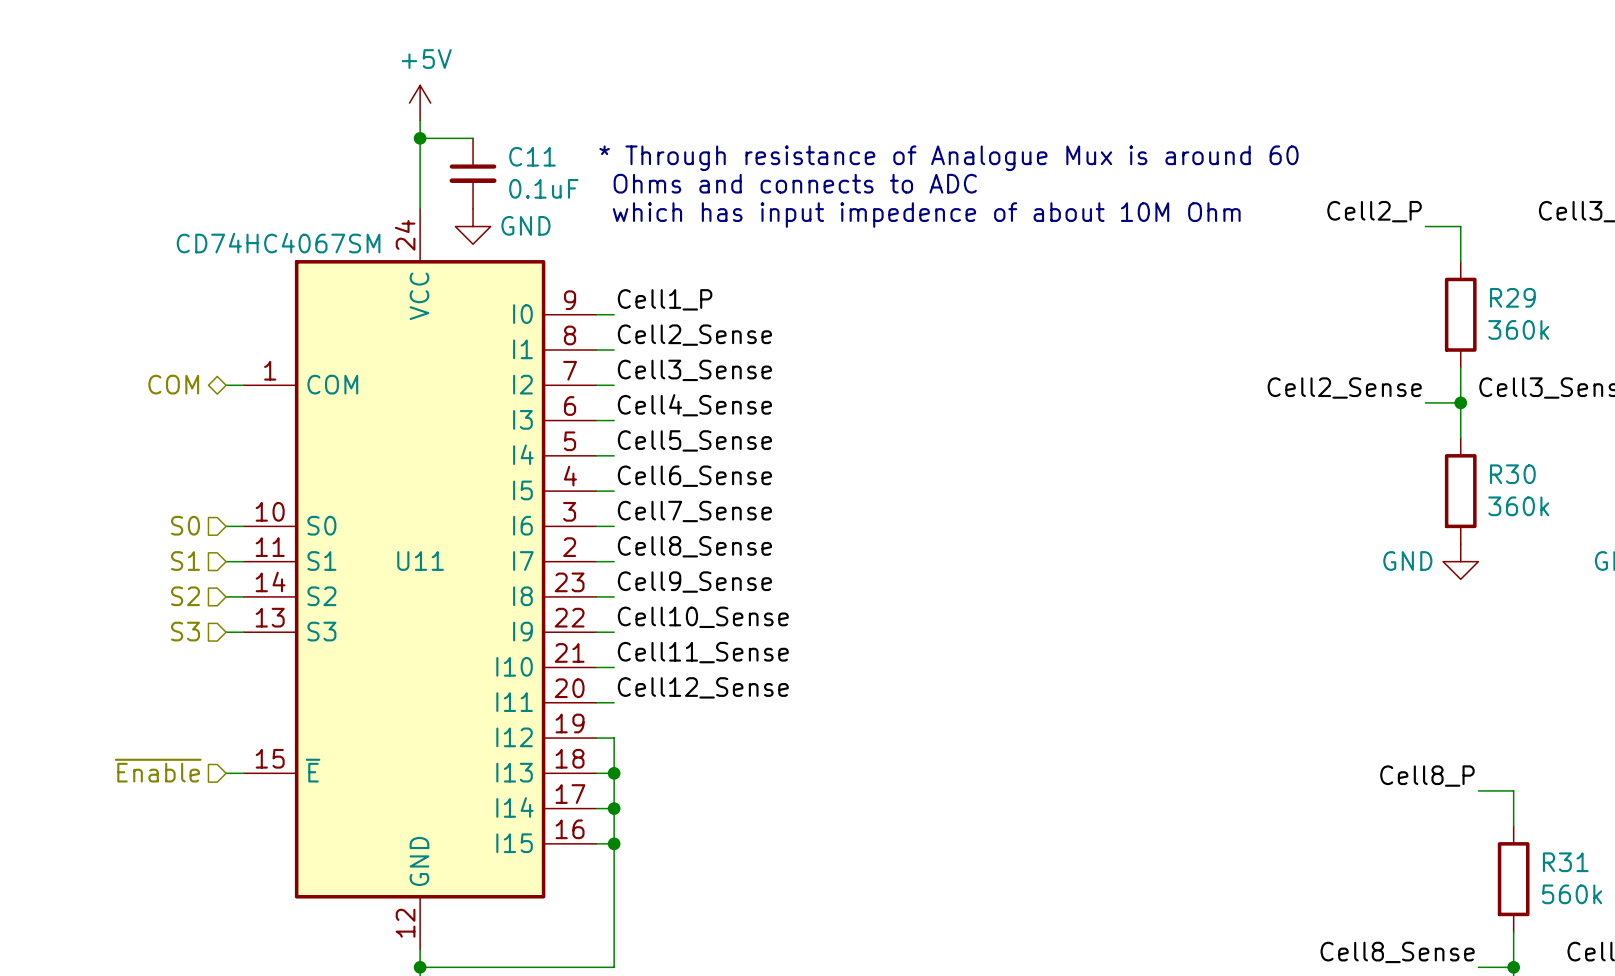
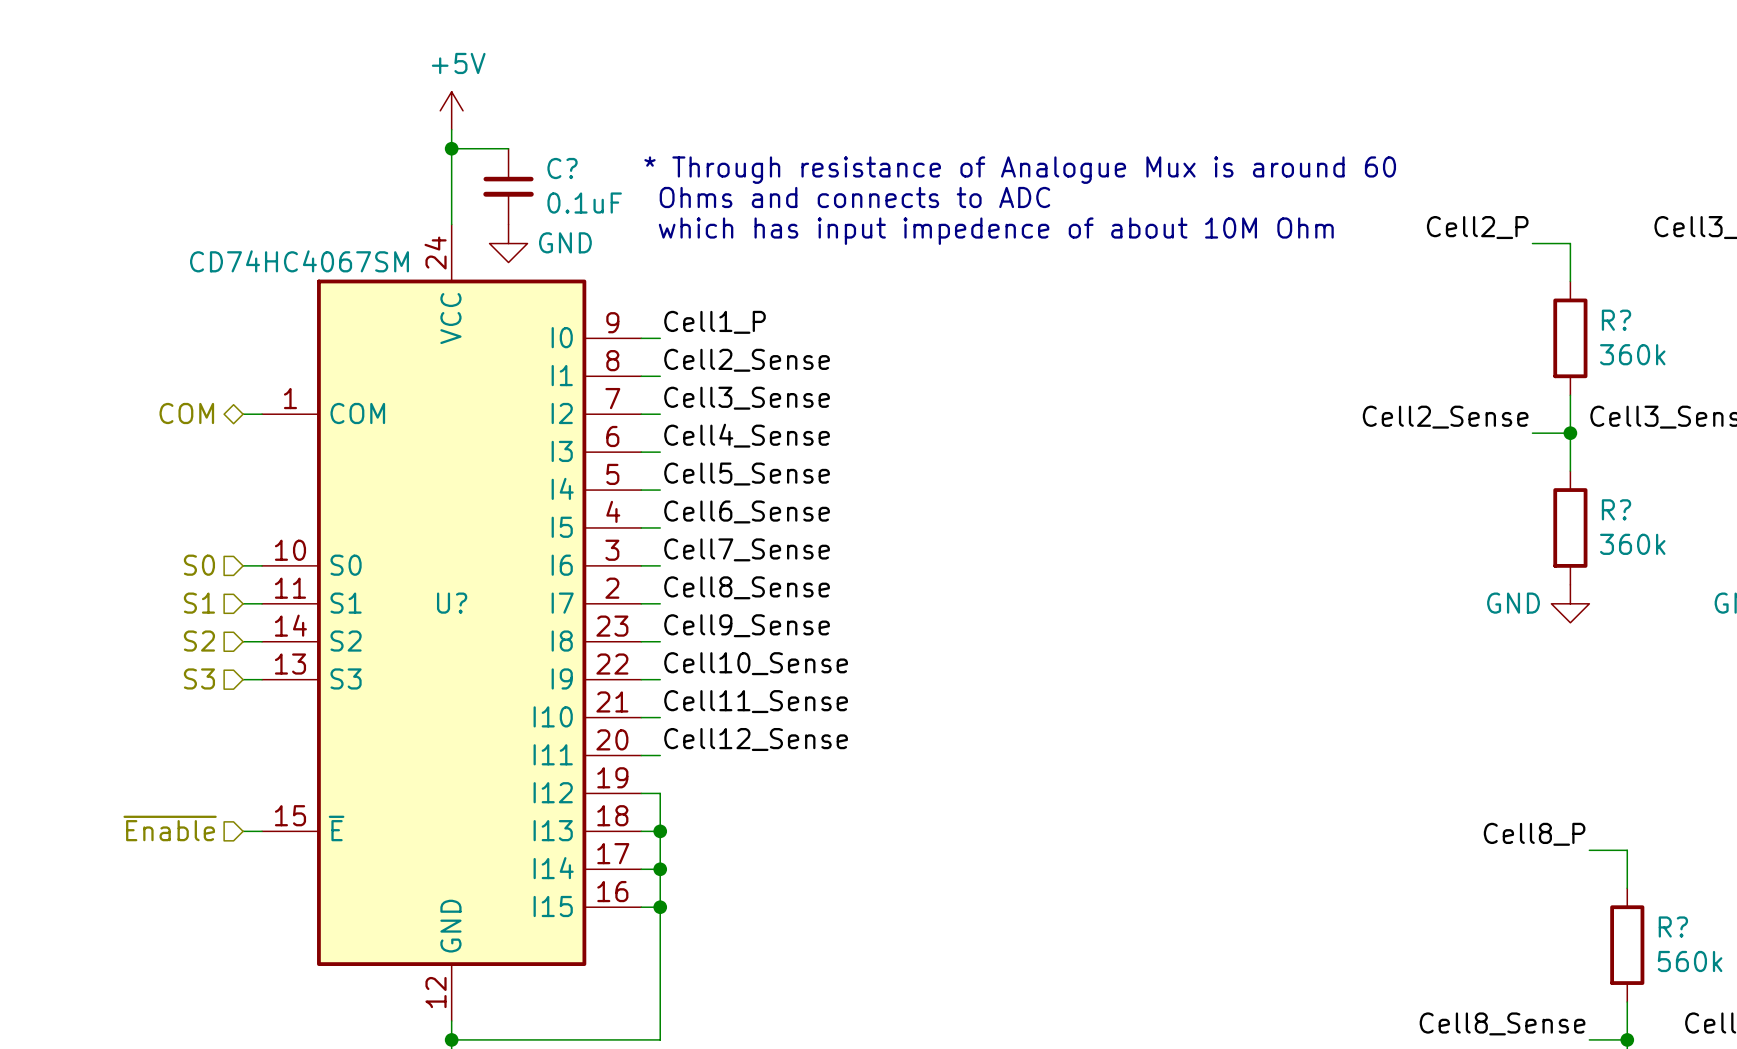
C11 name: C11 (532, 156) -> C? (562, 168)
R29 name: R29 (1512, 297) -> R? (1616, 320)
R30 name: R30 (1512, 474) -> R? (1616, 509)
U11 name: U11 (420, 561) -> U? (452, 603)
R31 name: R31 (1565, 862) -> R? (1673, 926)

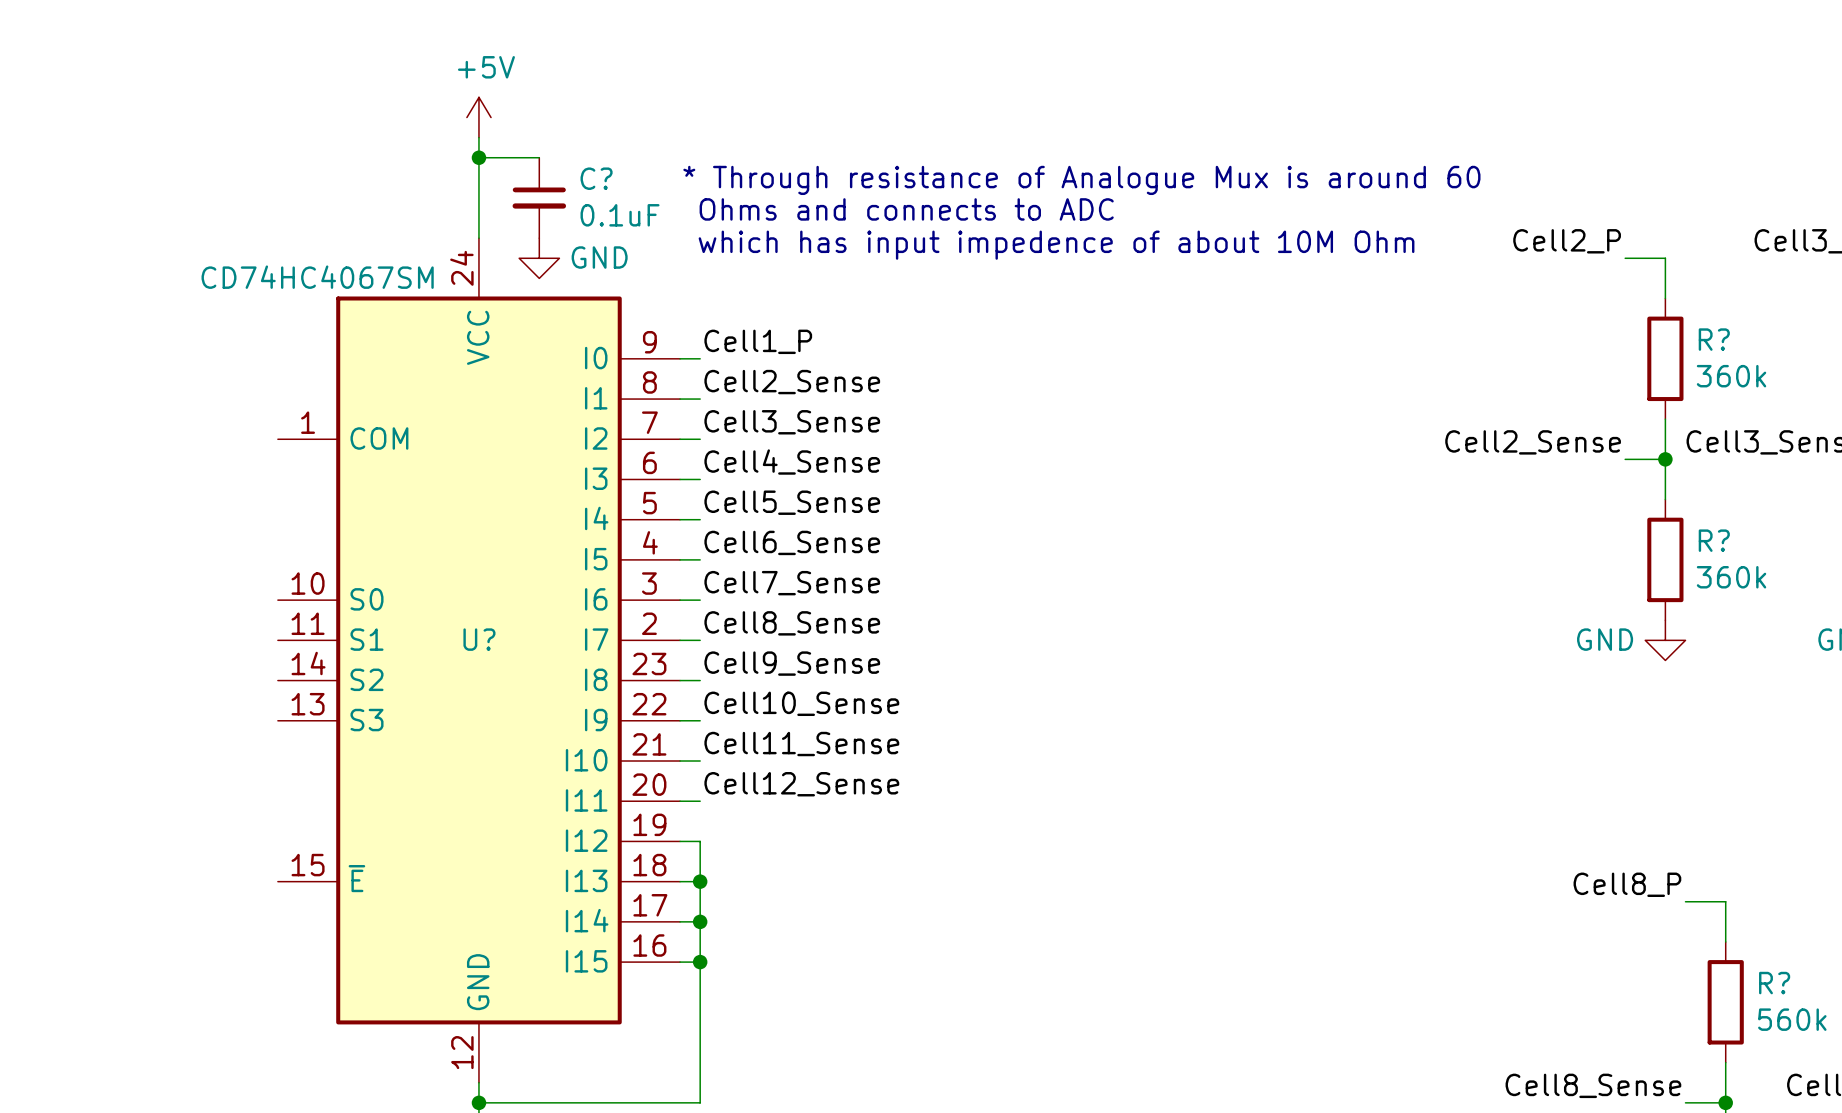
hierarchical label: COM (186, 413) -> none
wire: (243, 414) (262, 414) -> none
hierarchical label: S0 (199, 565) -> none
wire: (243, 565) (262, 565) -> none
hierarchical label: S1 (199, 603) -> none
wire: (243, 603) (262, 603) -> none
hierarchical label: S2 (199, 641) -> none
wire: (243, 641) (262, 641) -> none
hierarchical label: S3 (199, 678) -> none
wire: (243, 679) (262, 679) -> none
hierarchical label: ~{Enable} (170, 828) -> none
wire: (243, 831) (262, 831) -> none

